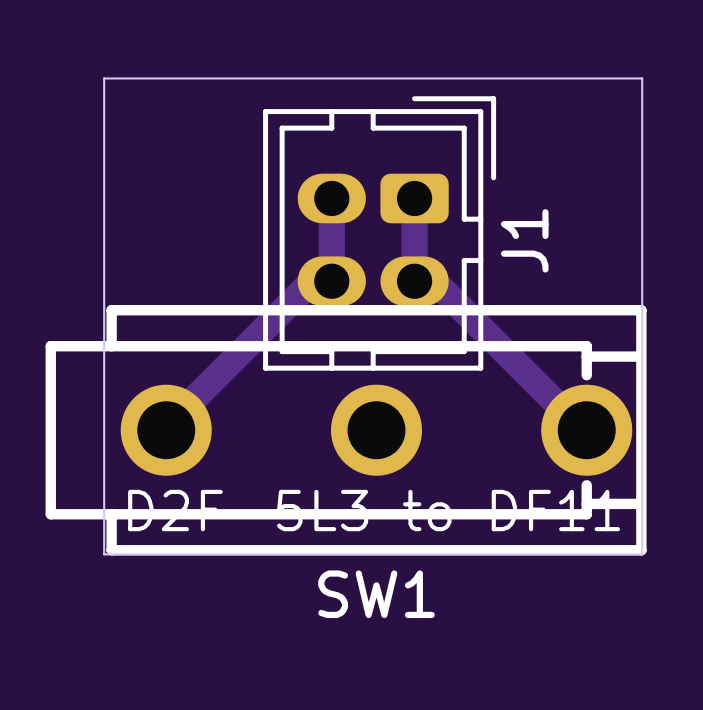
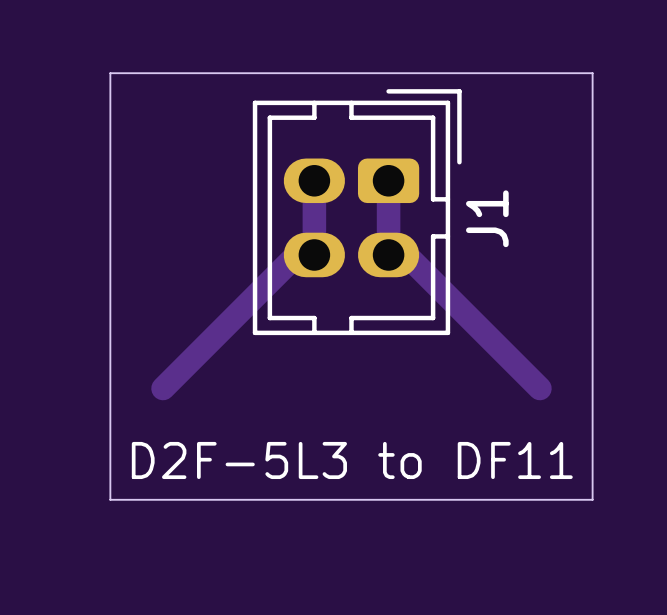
SW1: (346, 430) -> none

